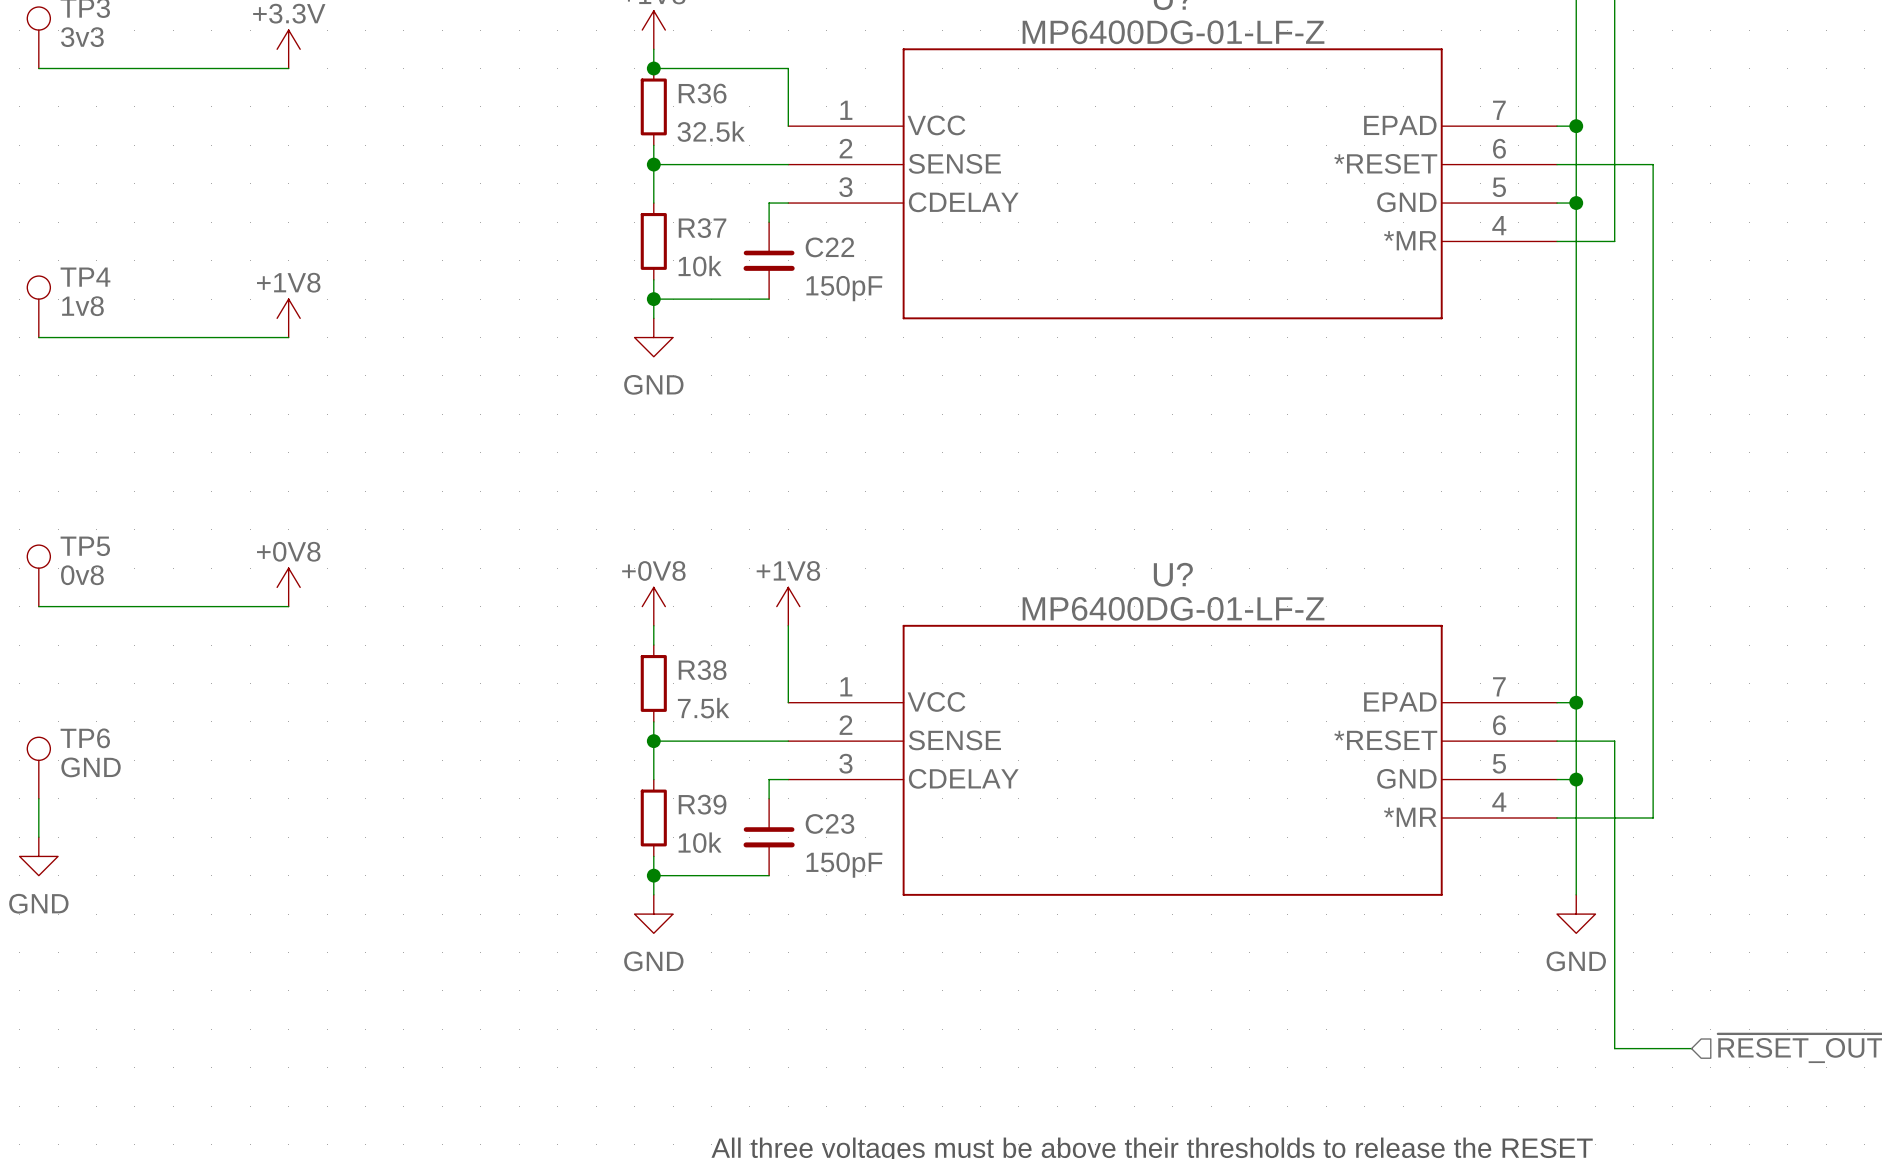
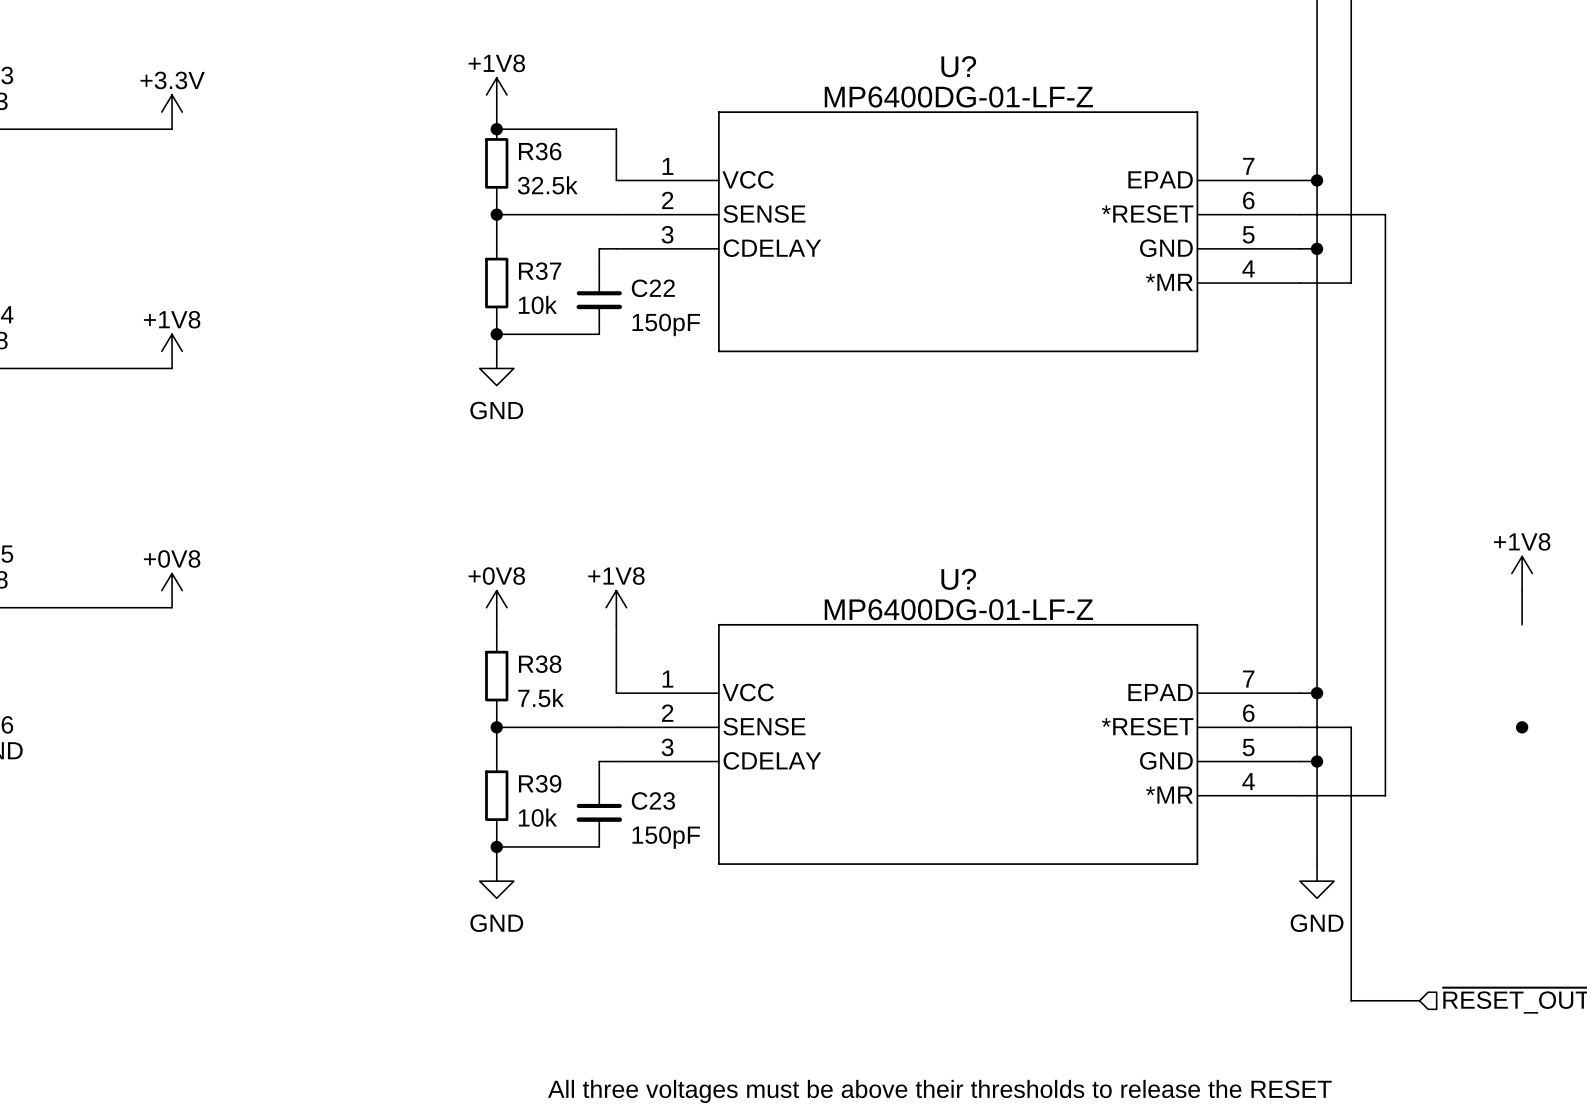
power symbol: none -> +1V8 (1522, 573)
wire: none -> (1522, 590) (1522, 624)
junction: none -> (1522, 727)

